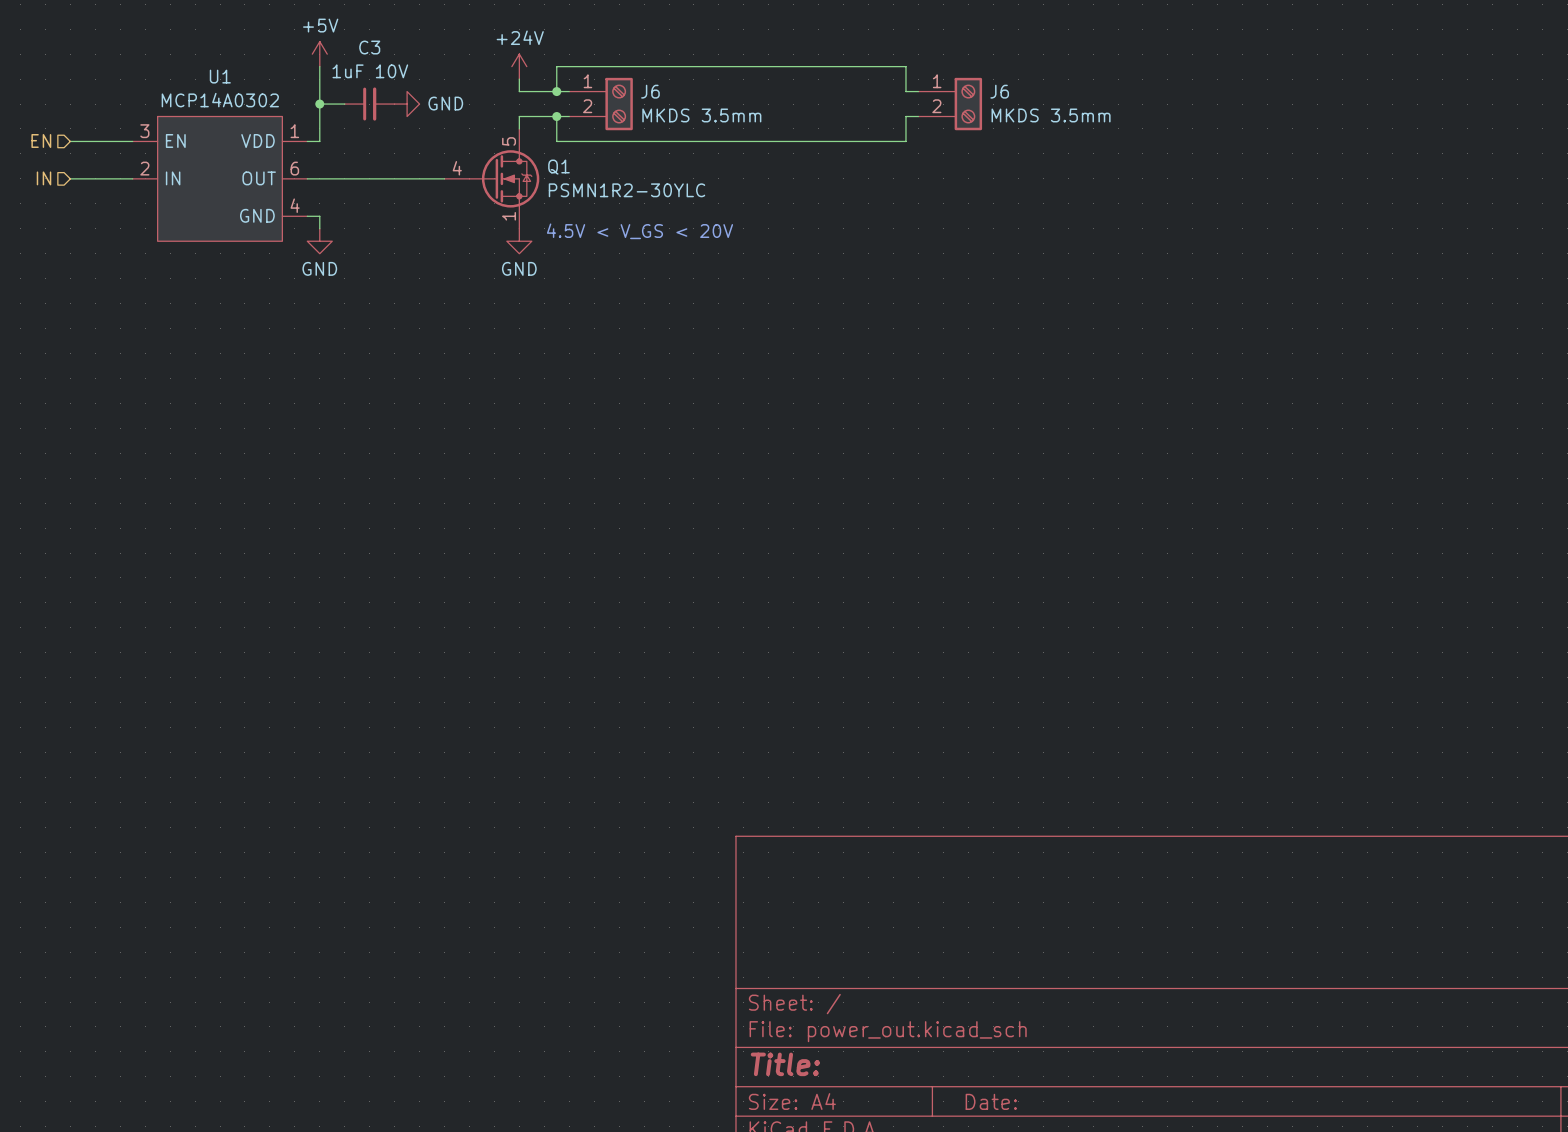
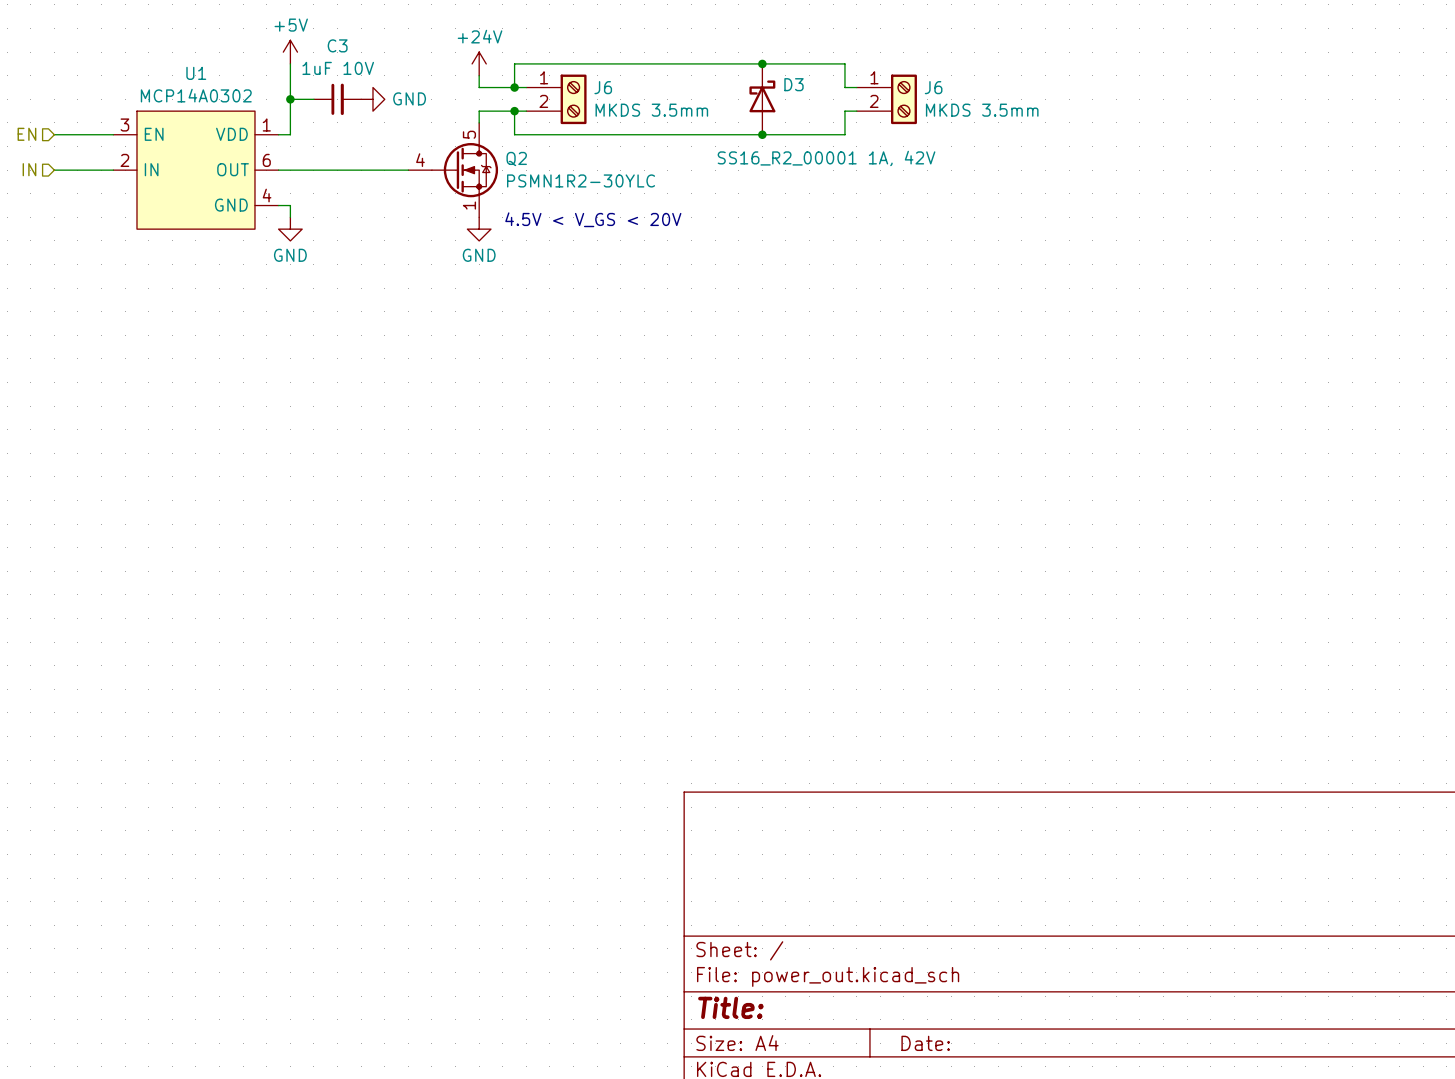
junction: none -> (762, 63)
D3: none -> SS16_R2_00001 1A, 42V (762, 99)
junction: none -> (762, 134)
Q1 name: Q1 (558, 167) -> Q2 (516, 159)

